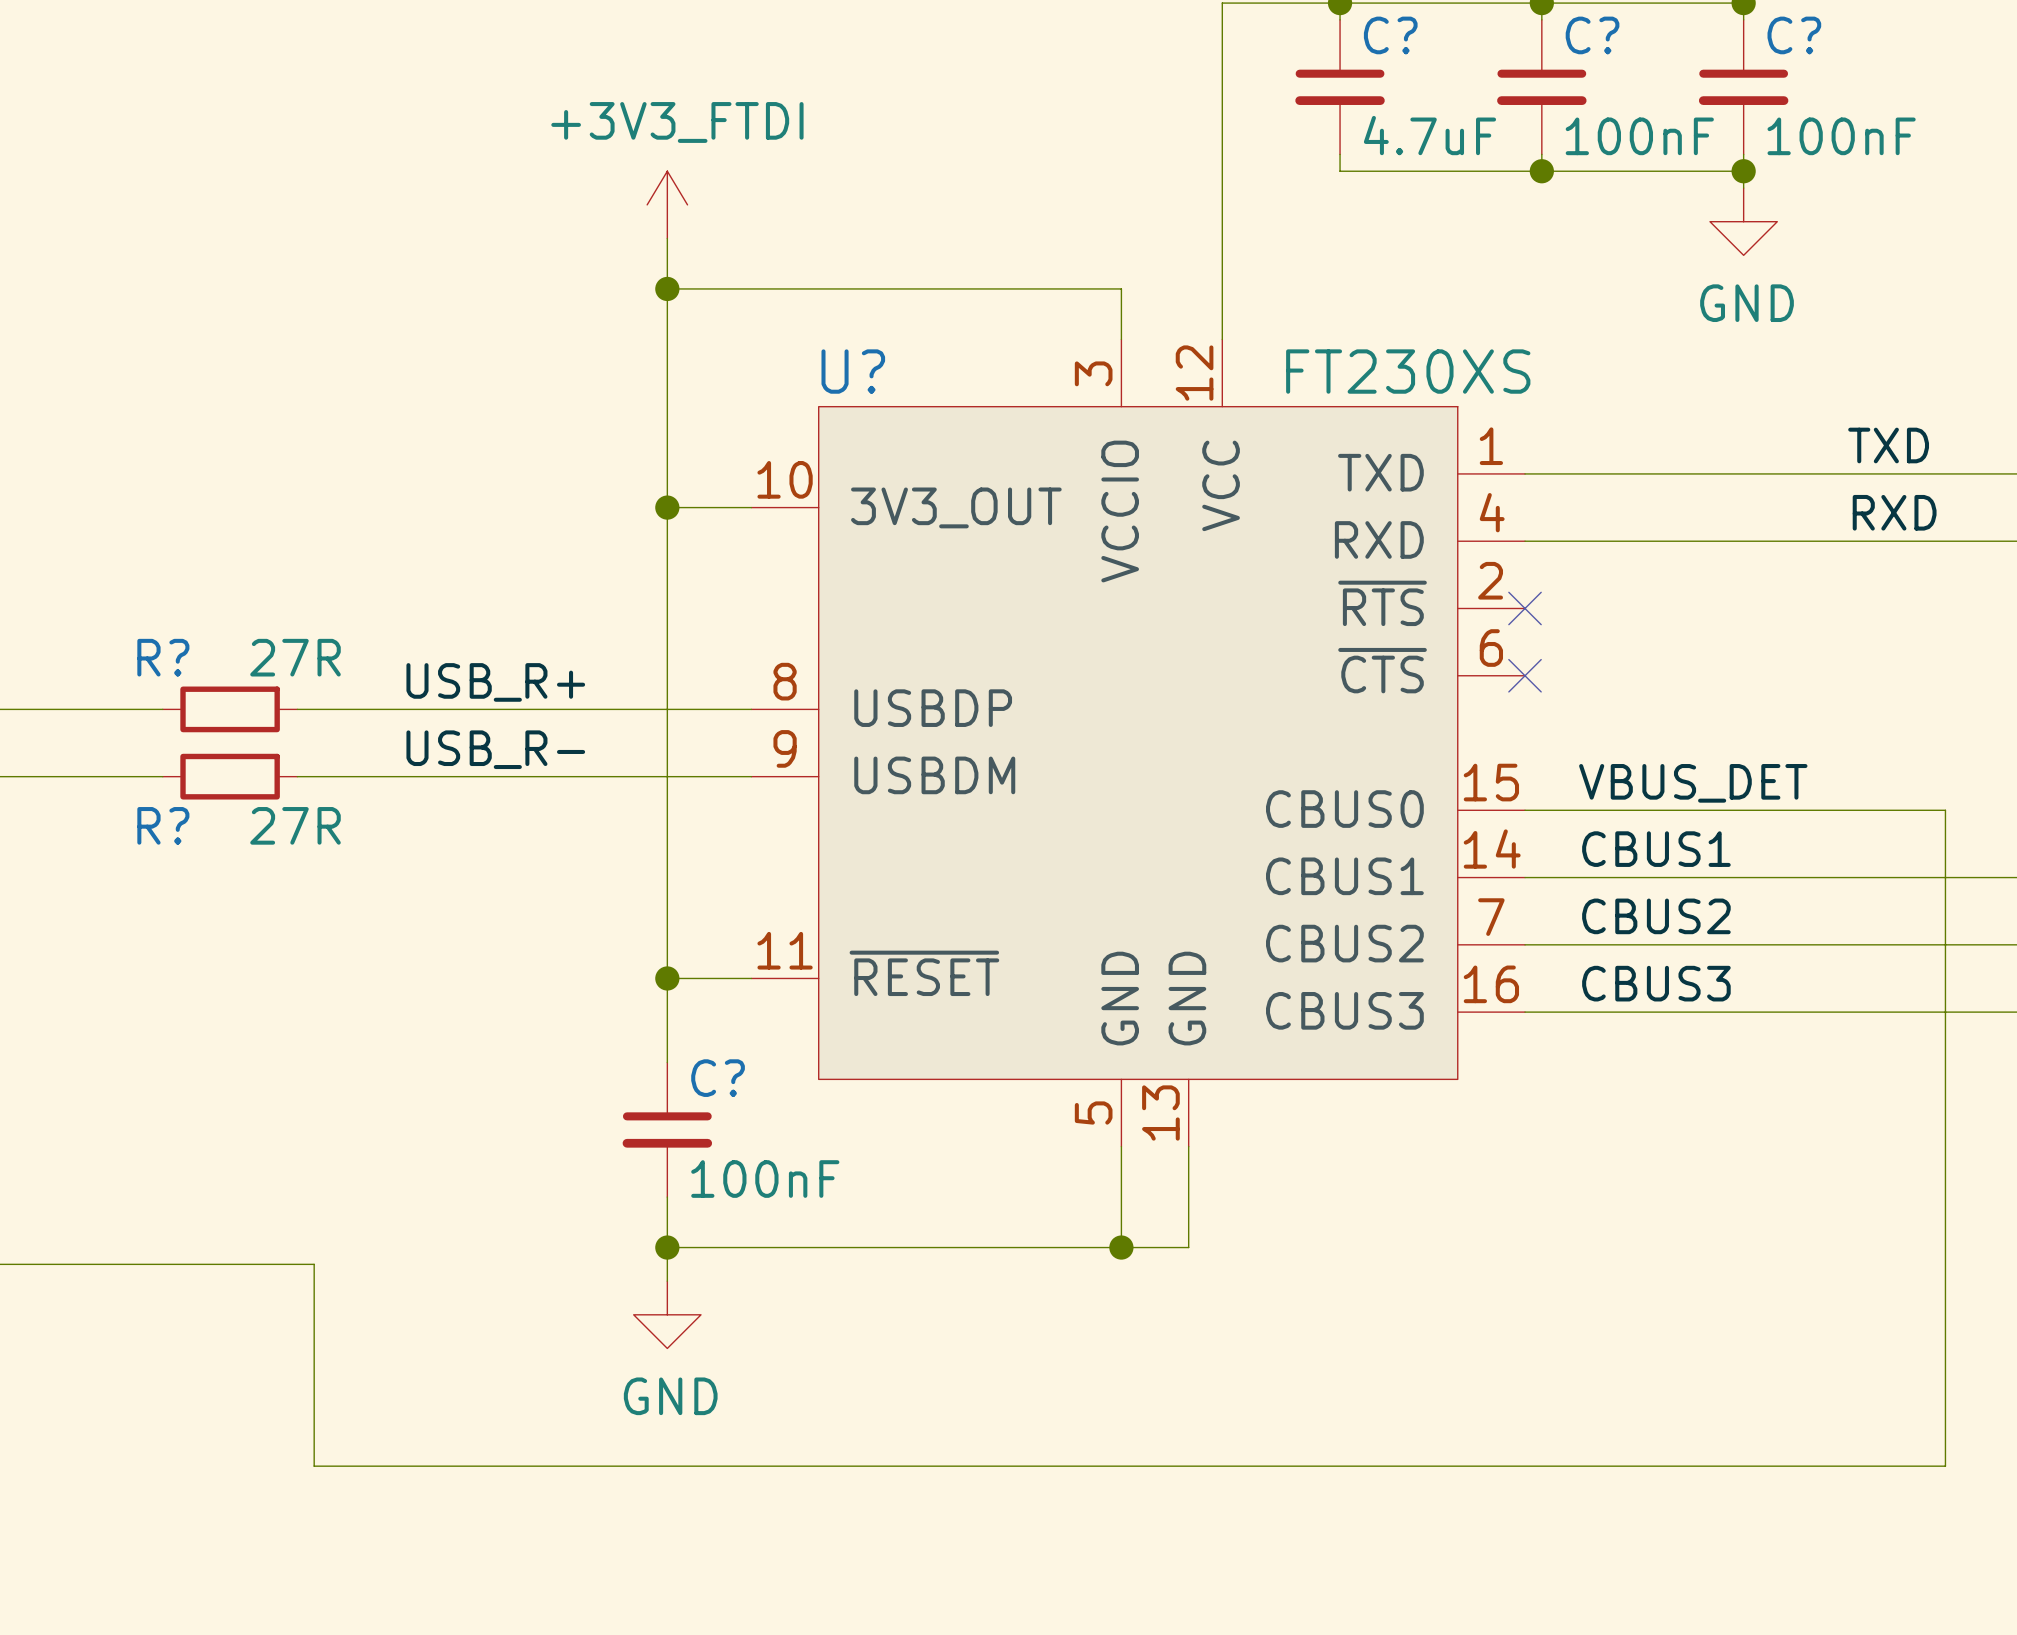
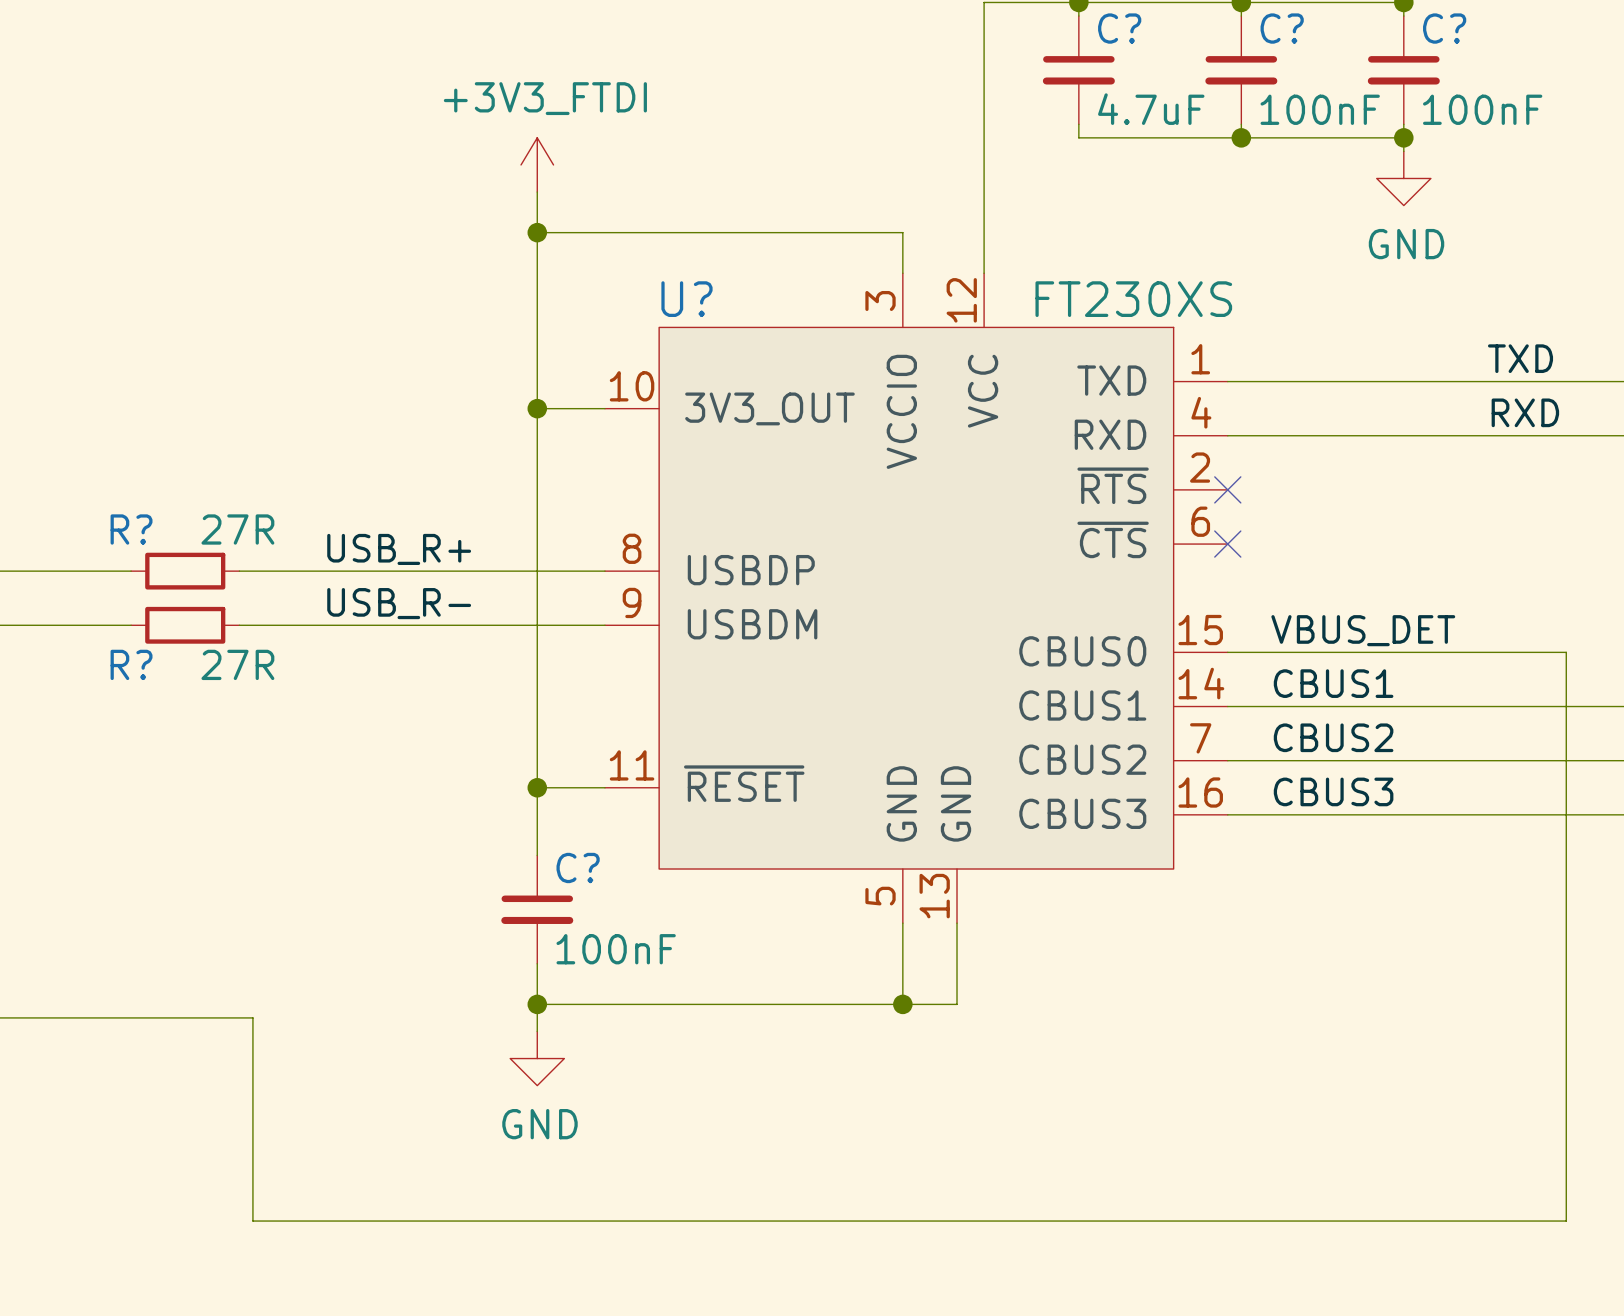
wire: (314, 1466) (1945, 1466) -> (252, 1180) (252, 1221) (1566, 1221) (1566, 1180)

